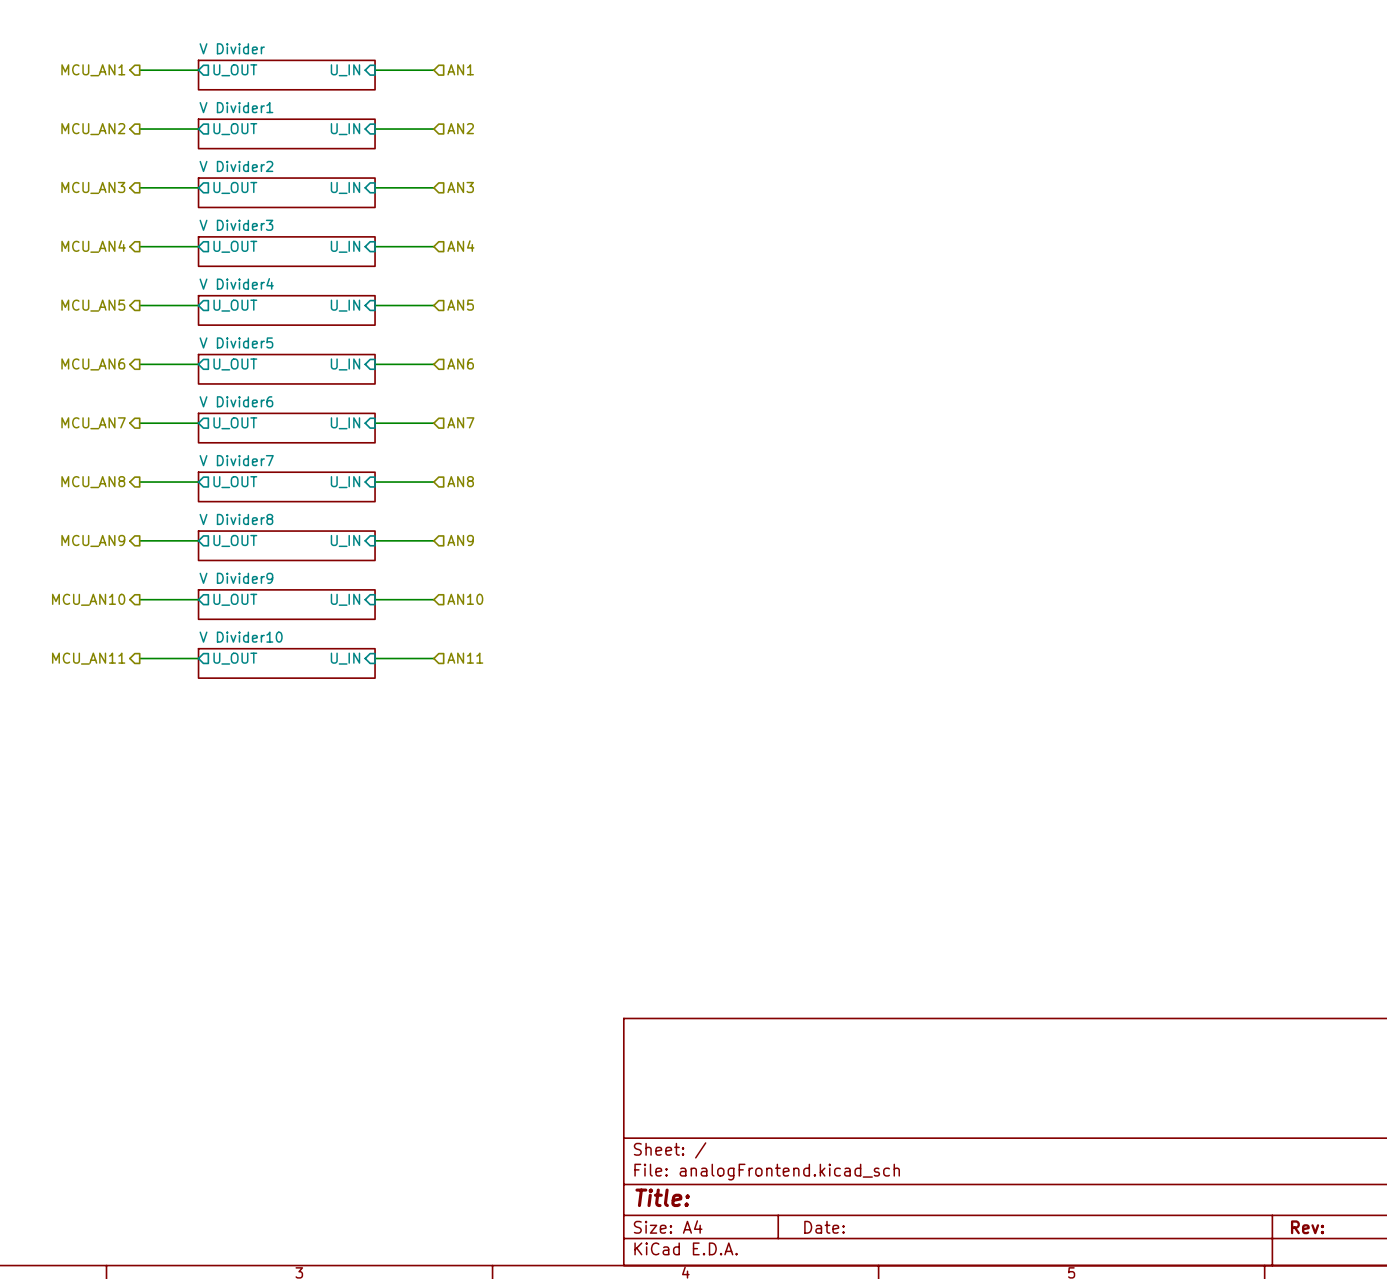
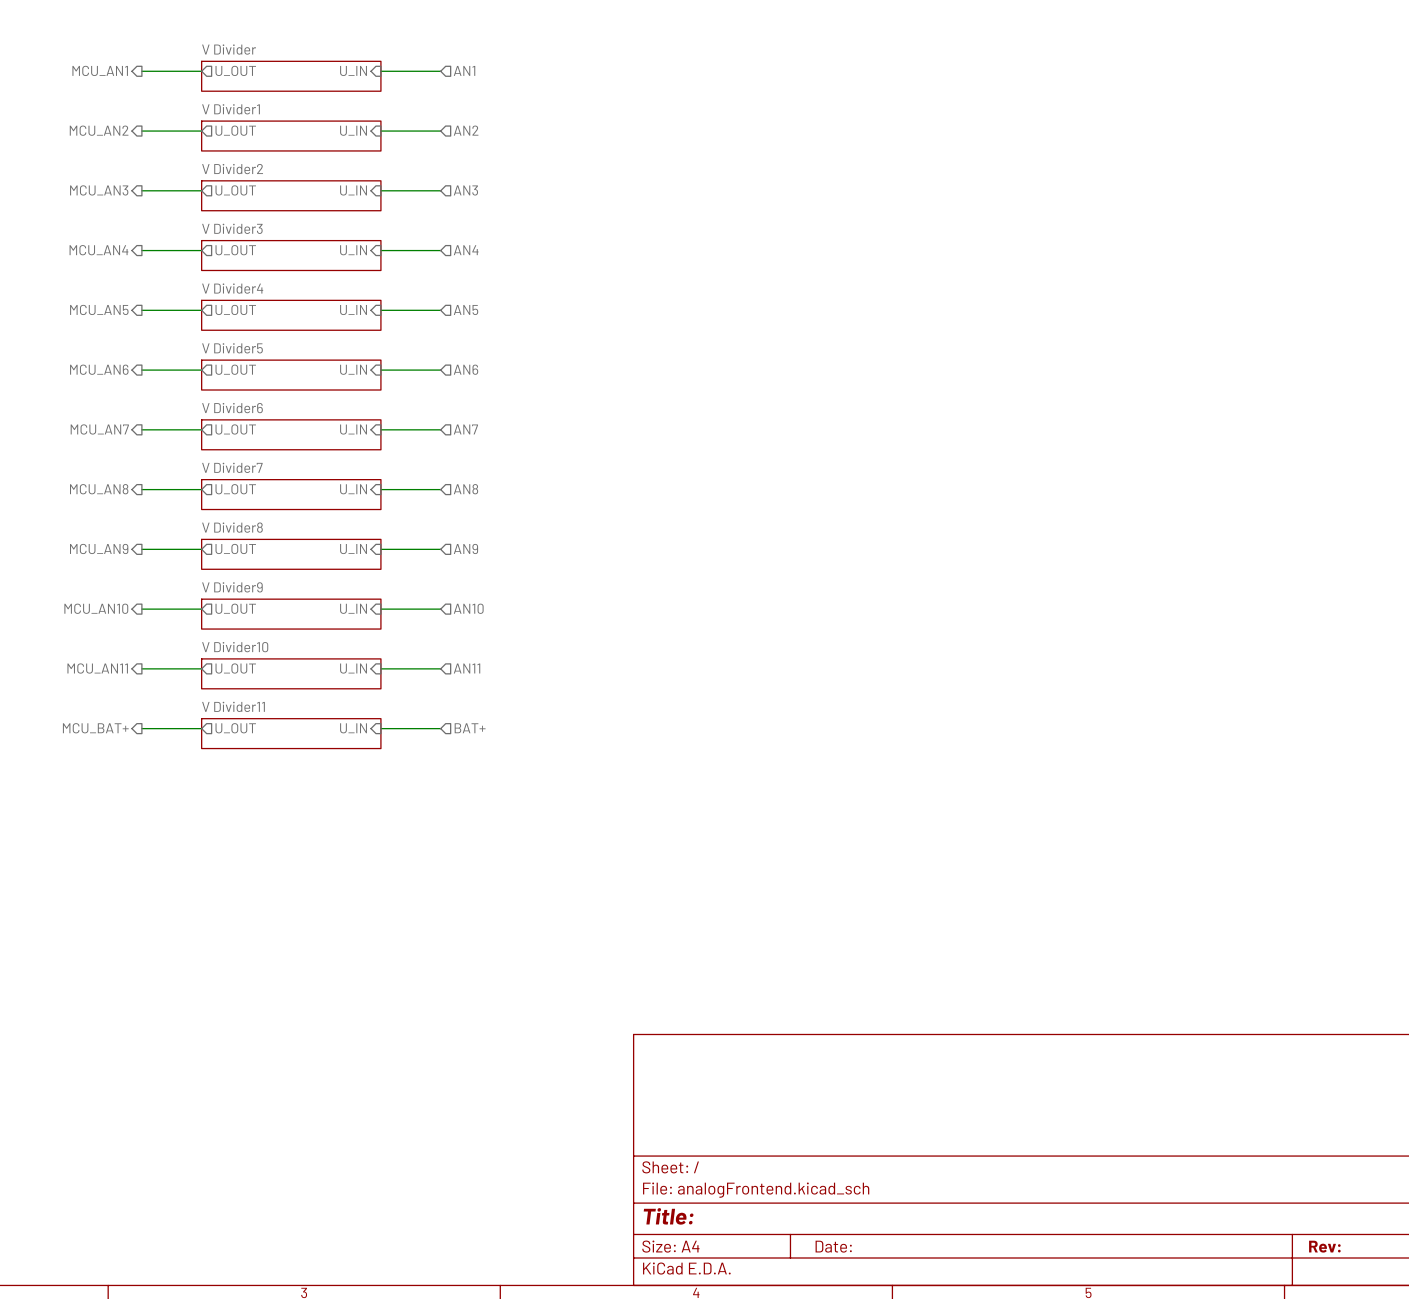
hierarchical label: none -> BAT+ (470, 728)
hierarchical label: none -> MCU_BAT+ (95, 728)
wire: none -> (141, 728) (201, 728)
sheet pin: none -> U_OUT (235, 728)
sheet pin: none -> U_IN (353, 728)
wire: none -> (380, 728) (440, 728)
sheet V Divider11: none -> (291, 733)

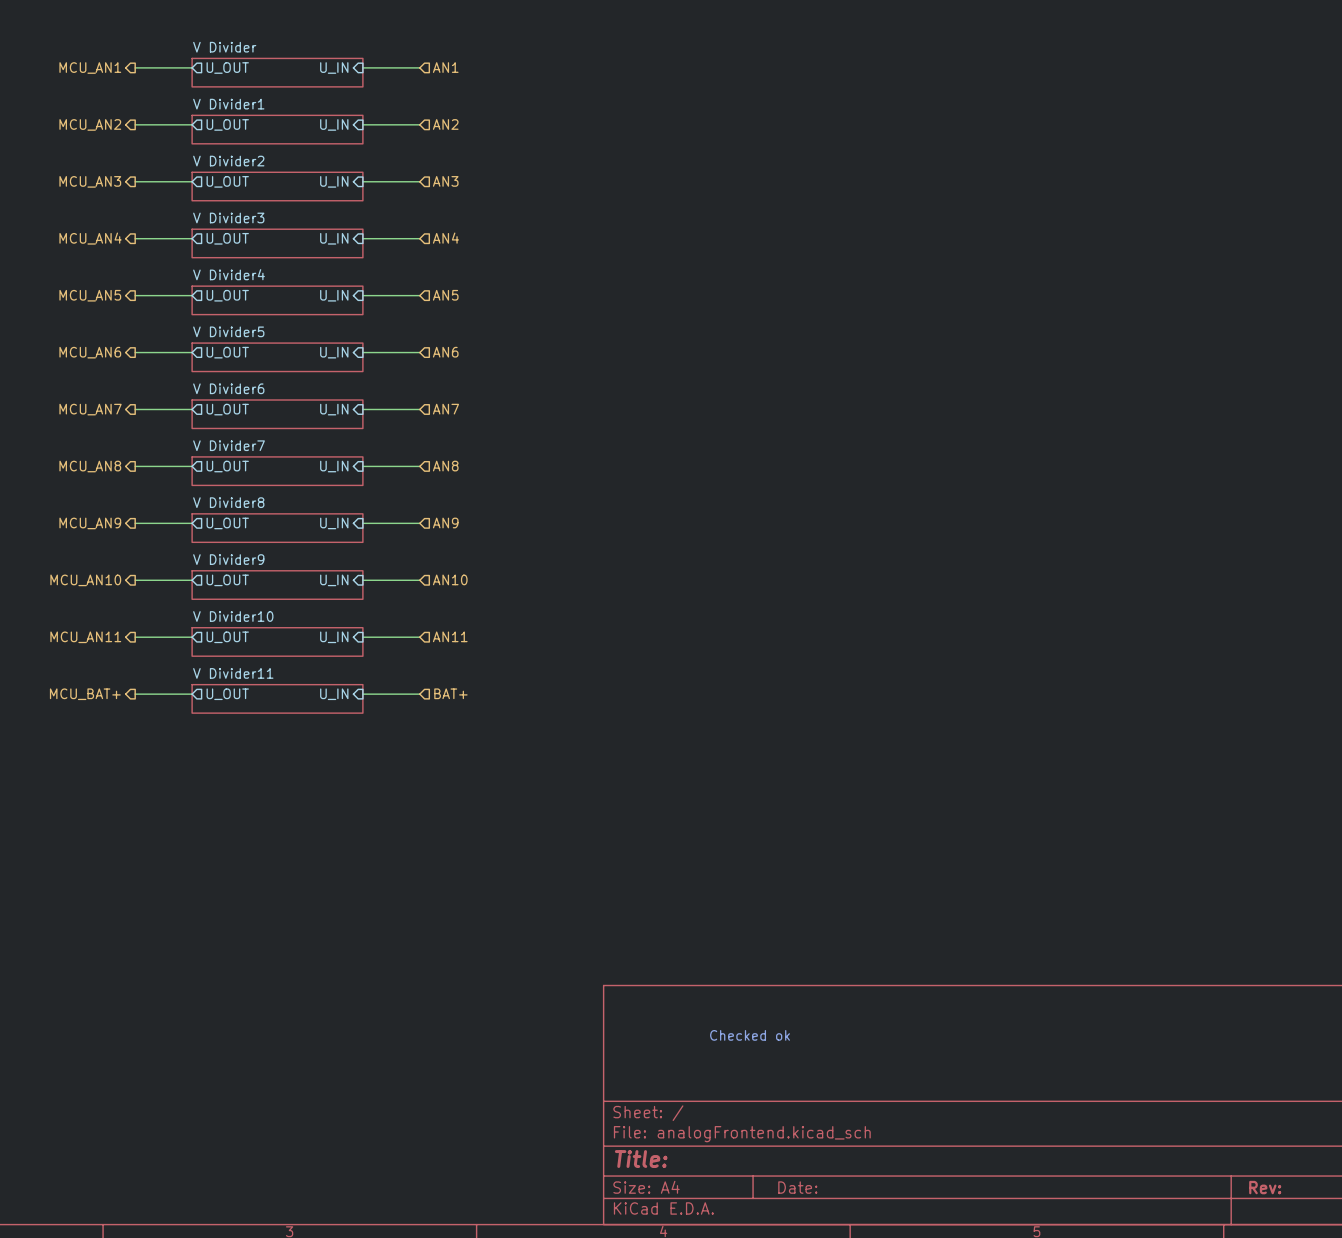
text: none -> Checked ok (750, 1035)

